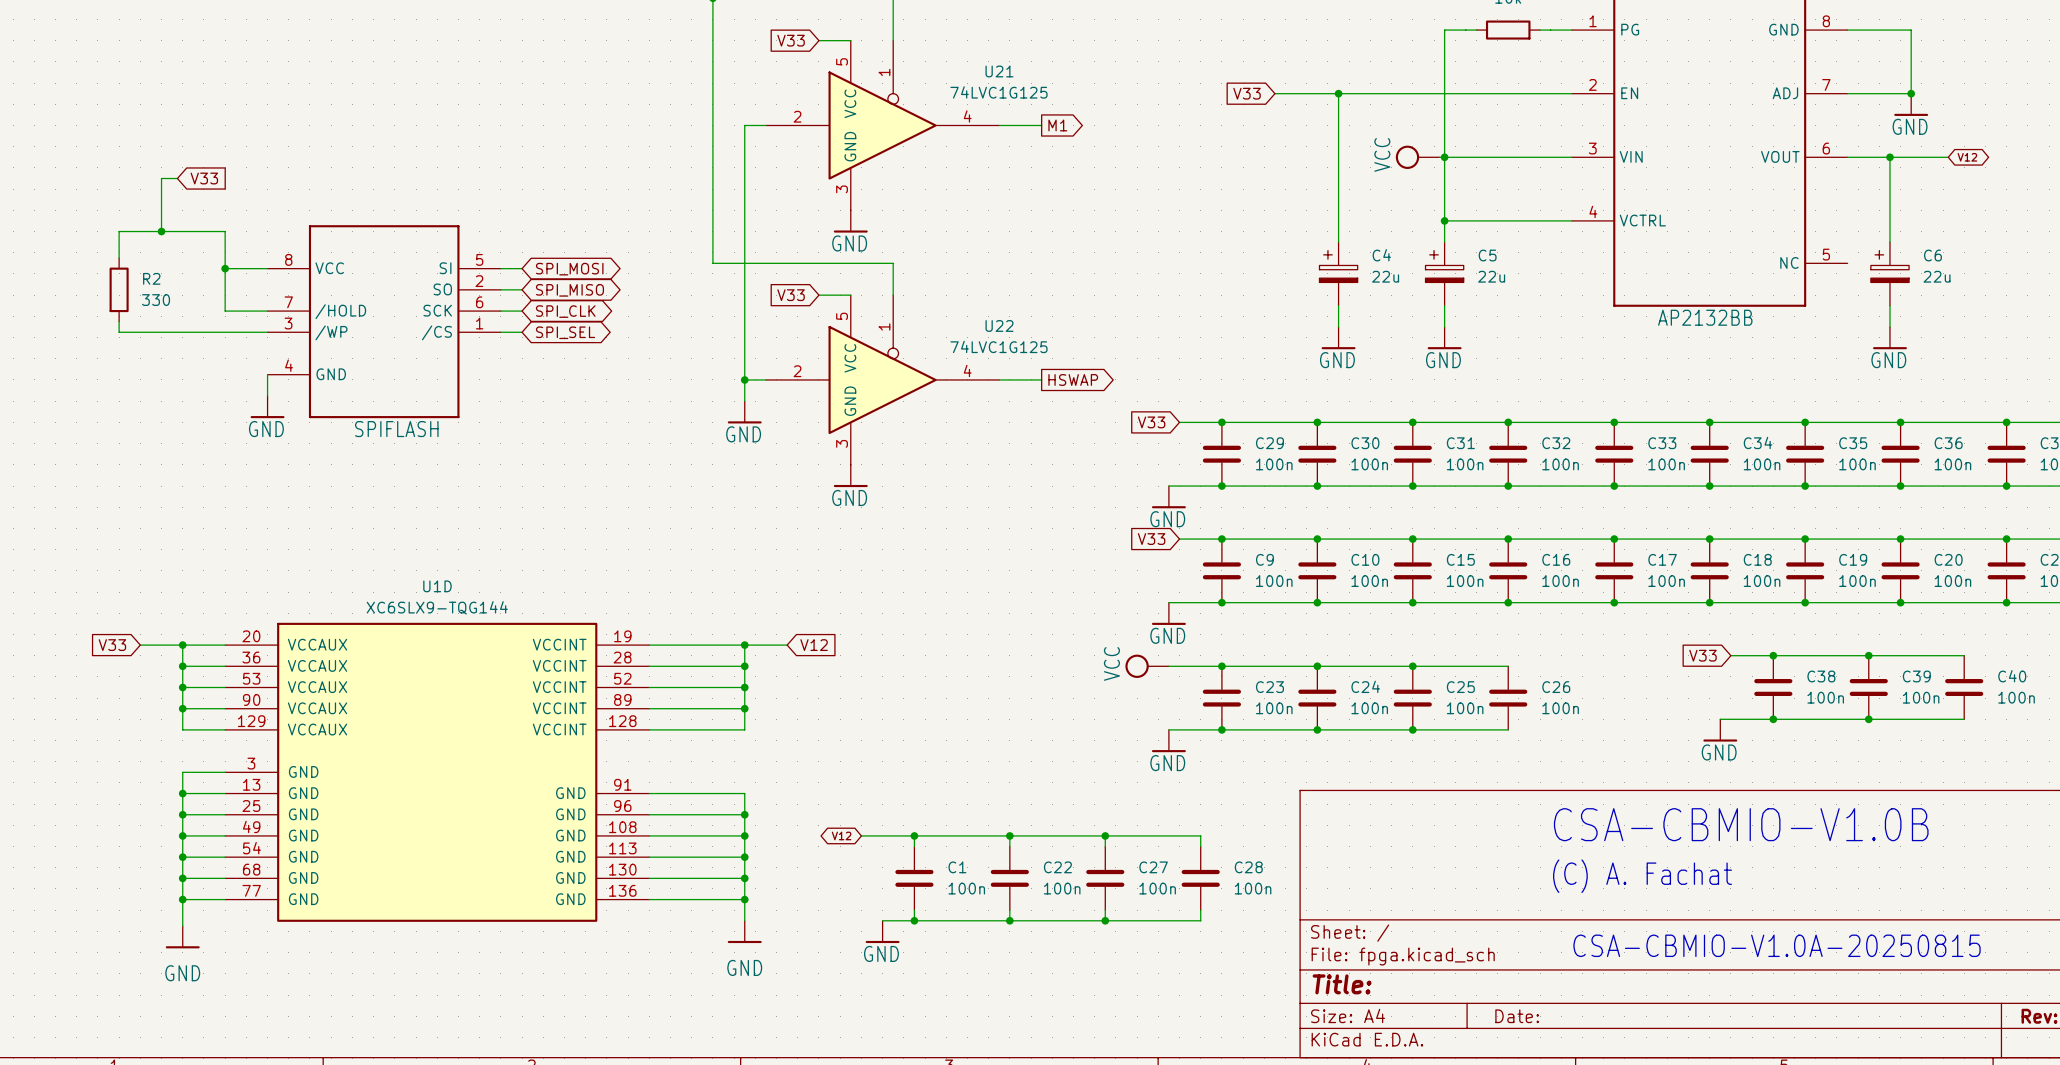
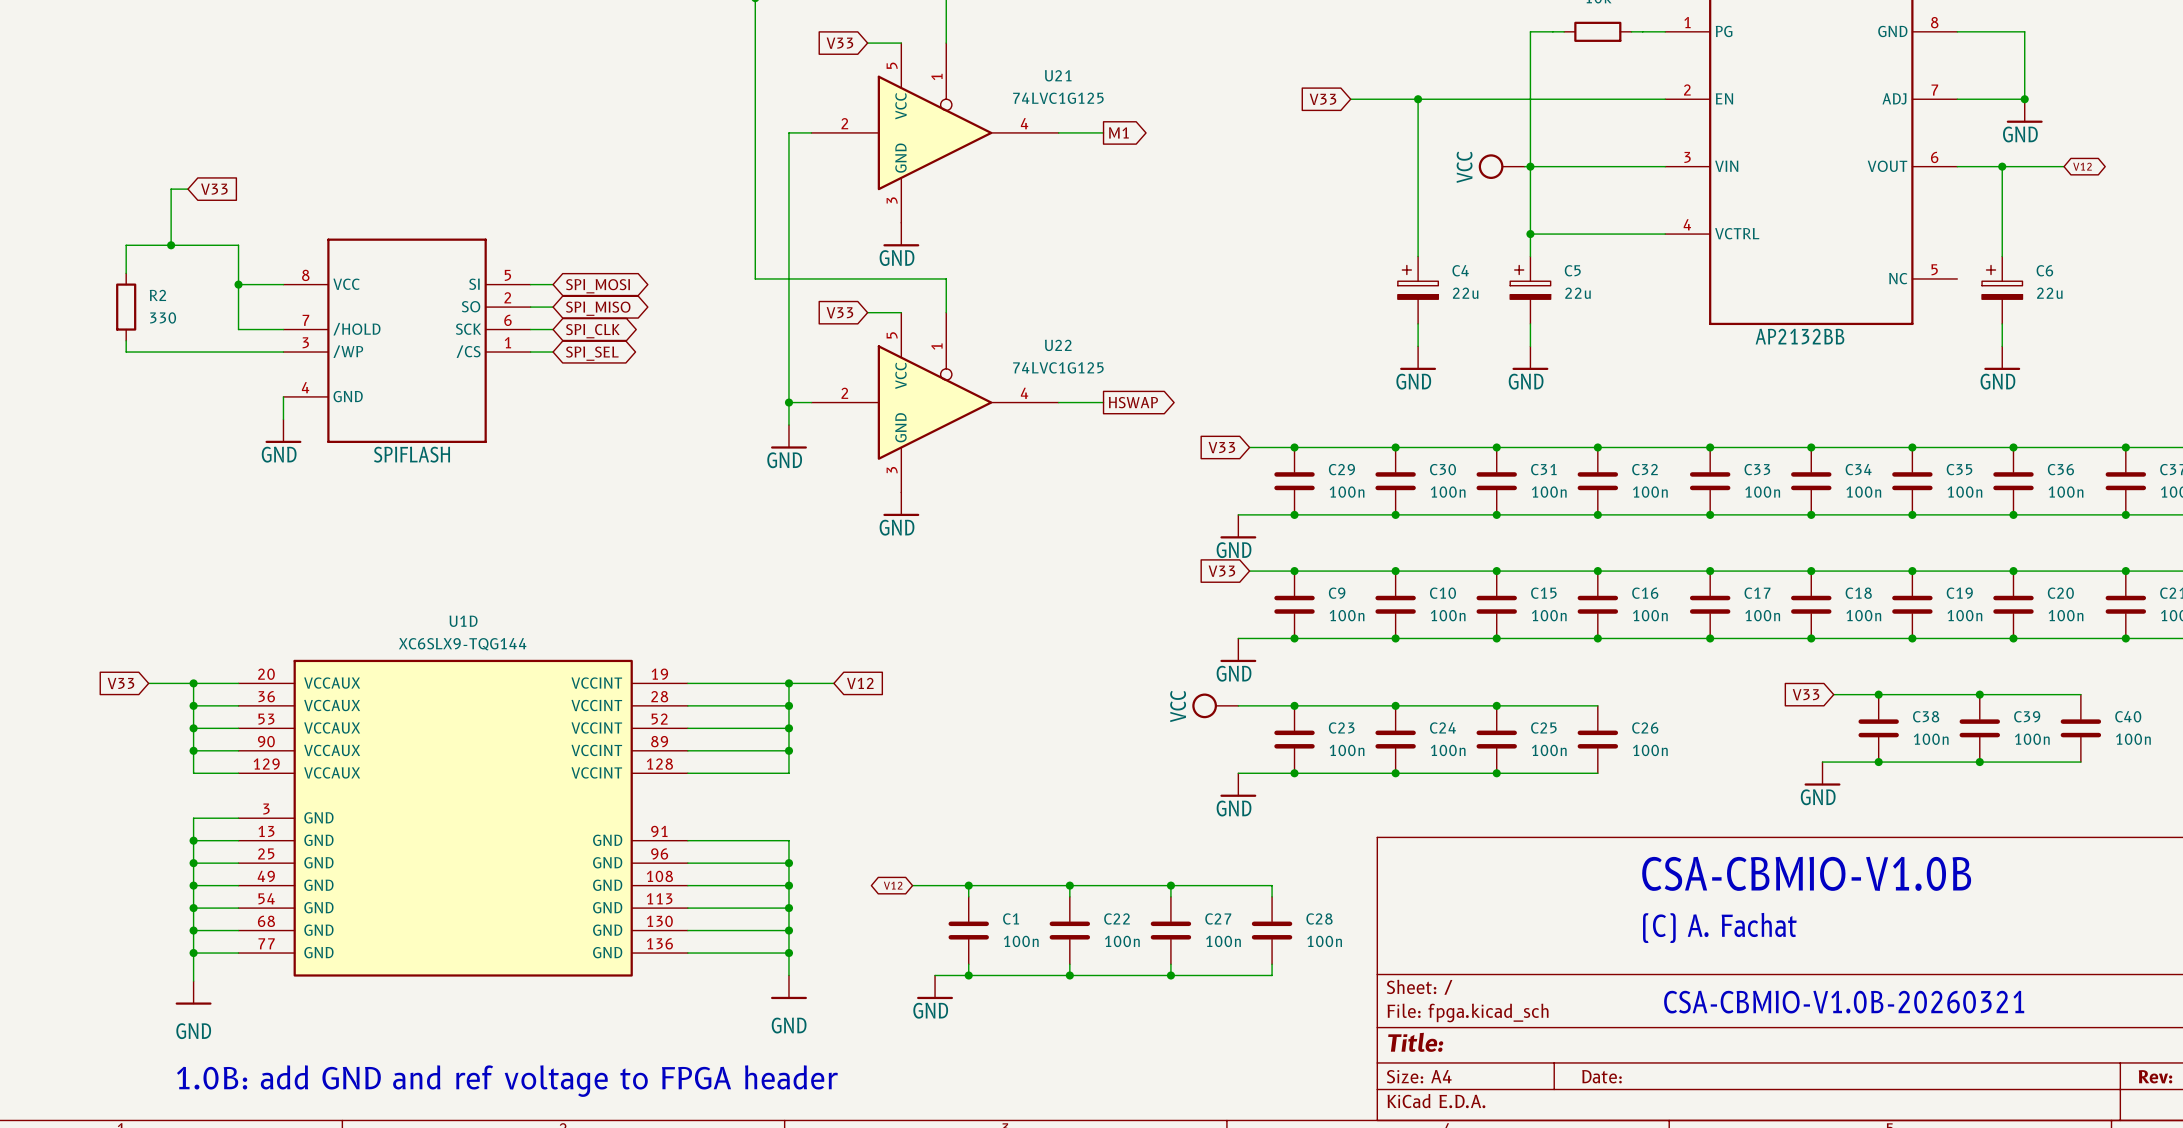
text: CSA-CBMIO-V1.0A-20250815 (1777, 945) -> CSA-CBMIO-V1.0B-20260321 (1844, 1002)
text: none -> 1.0B: add GND and ref voltage to FPGA header (507, 1081)

